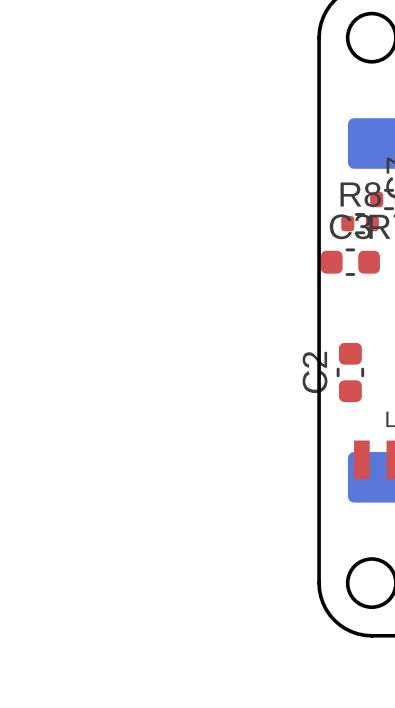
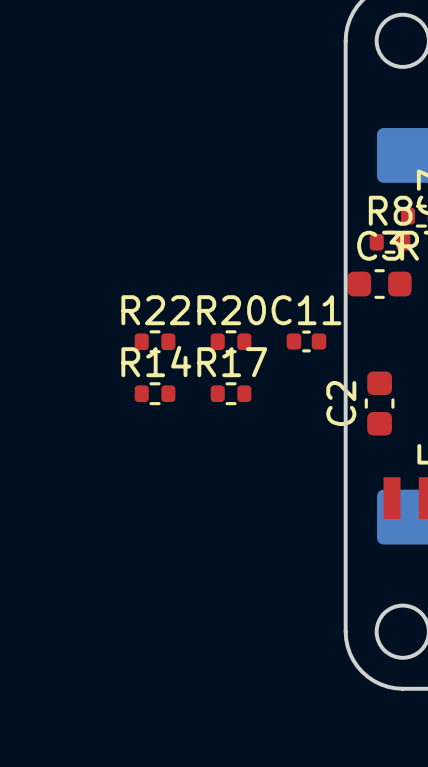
R22: none -> (155, 341)
R20: none -> (231, 341)
C11: none -> (306, 341)
R14: none -> (155, 393)
R17: none -> (231, 393)

